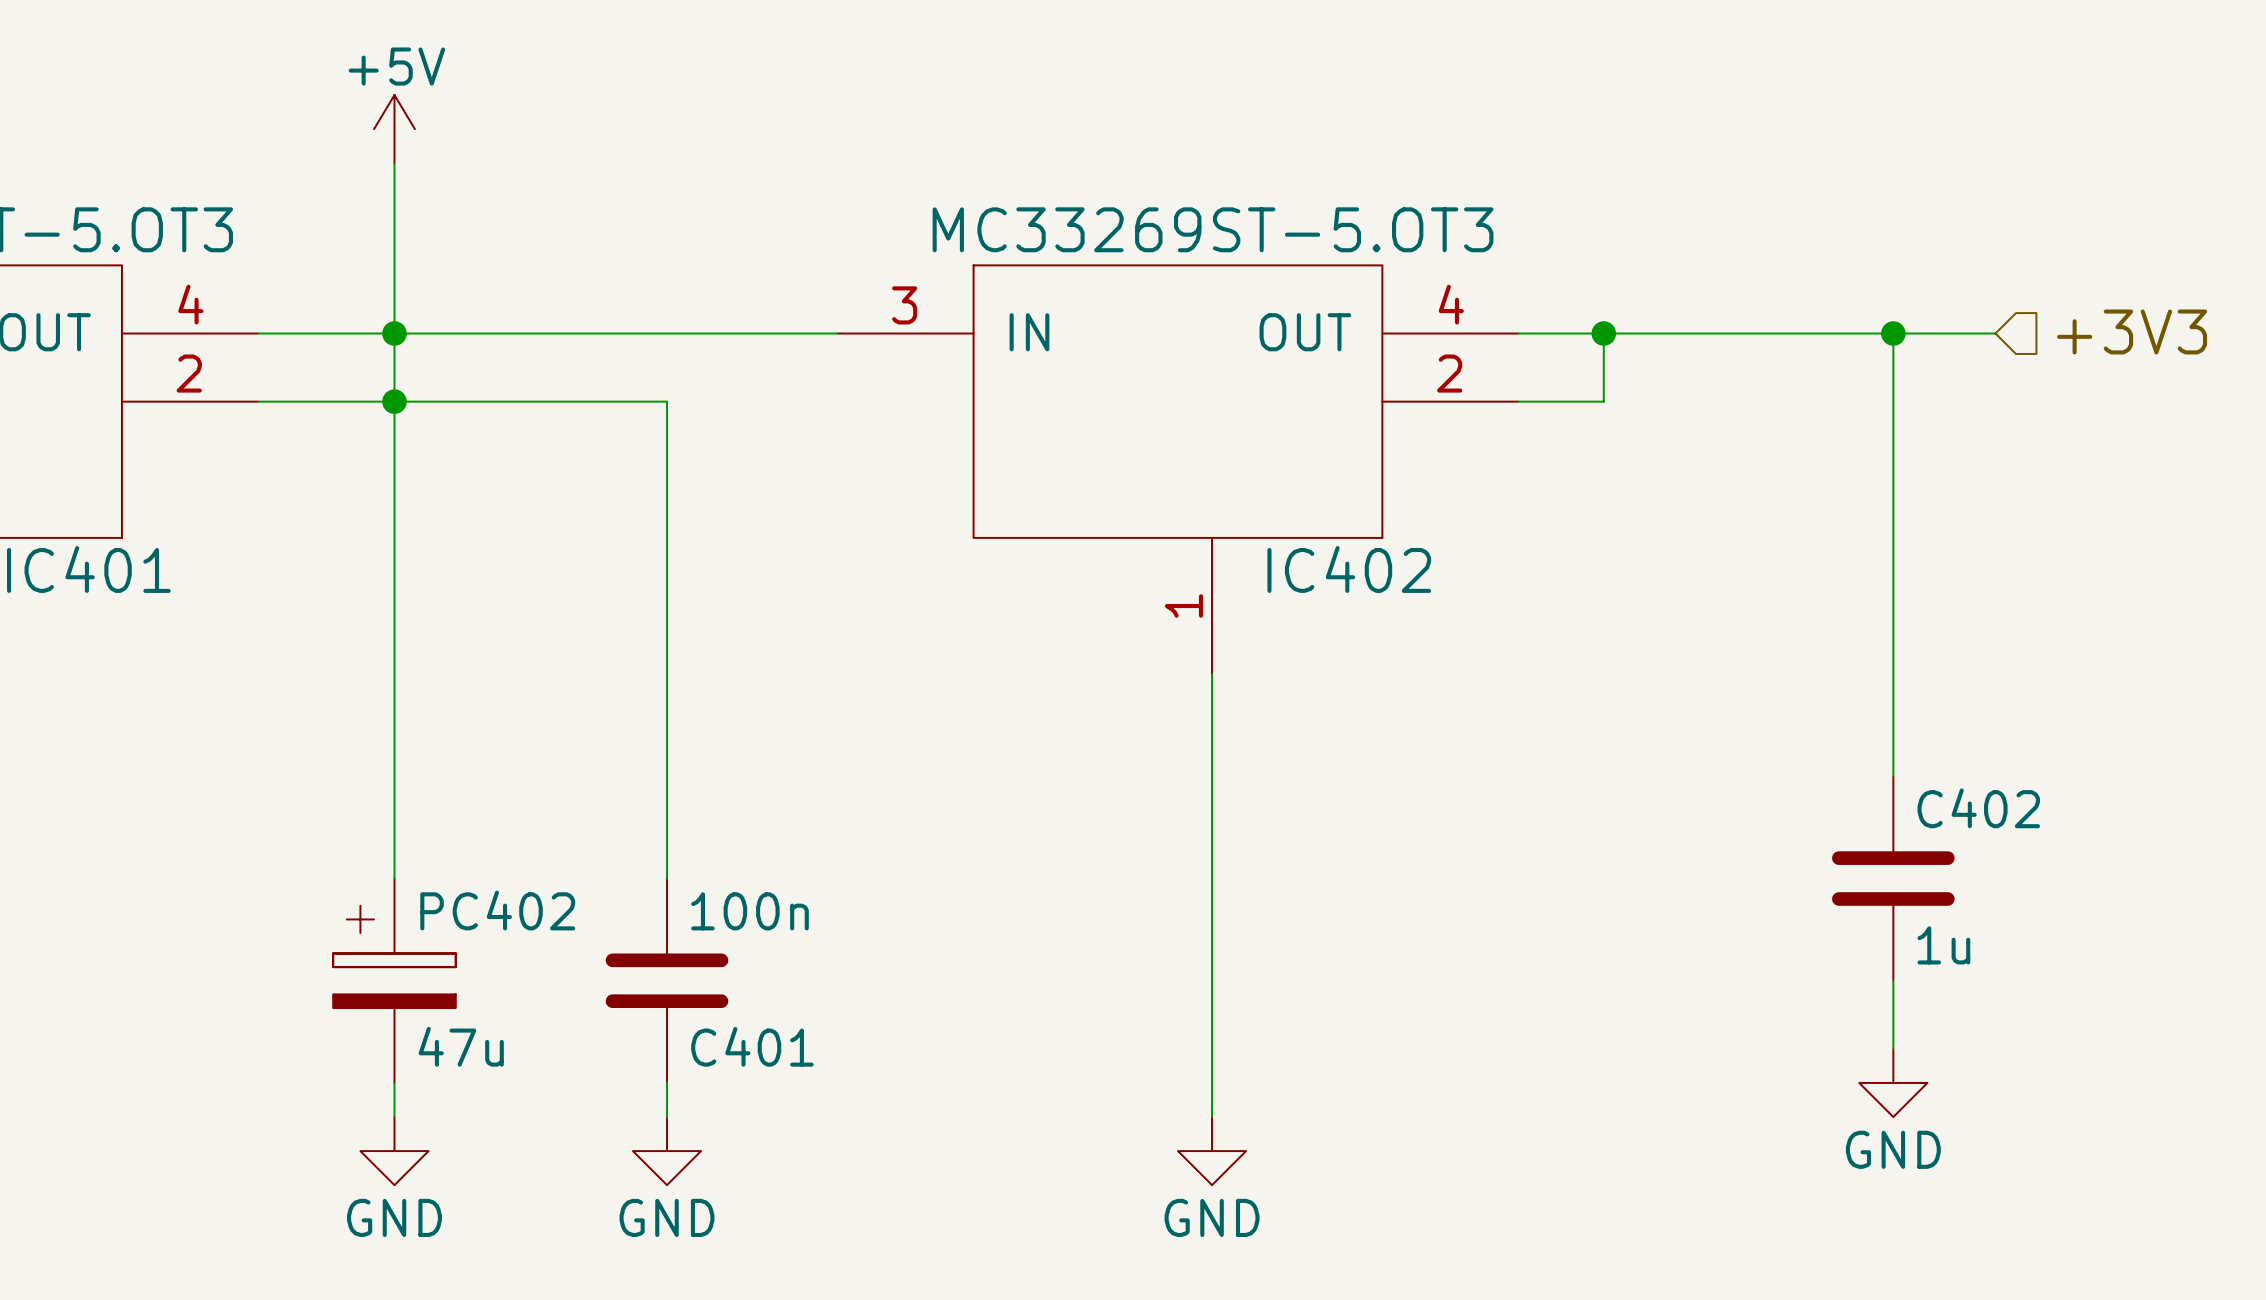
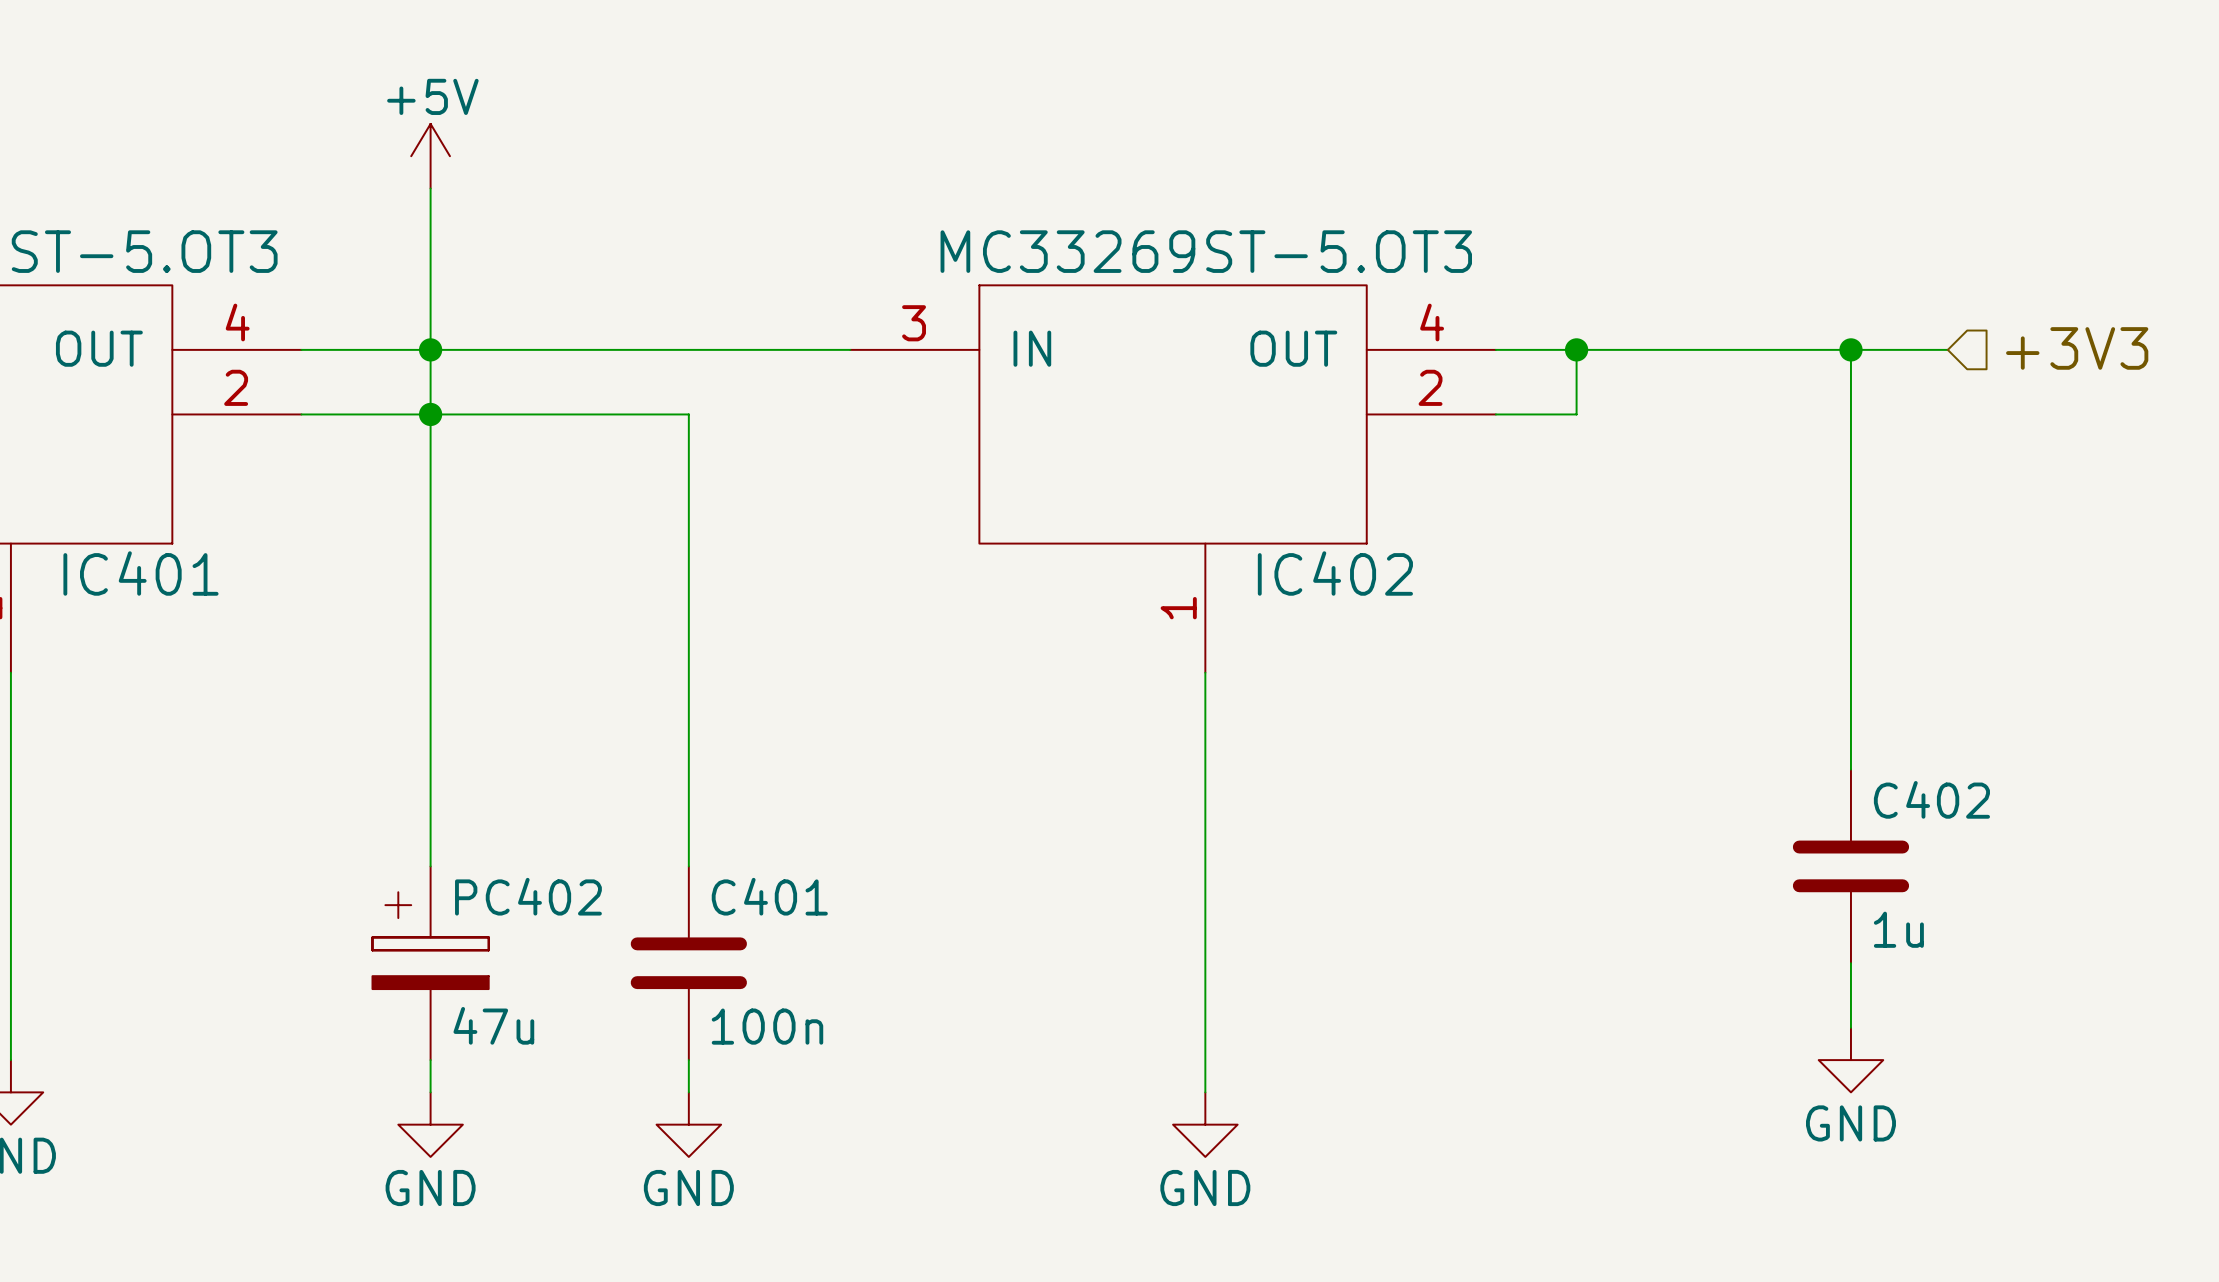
C401 value position: 100n (749, 911) -> 100n (767, 1026)
C401 name position: C401 (752, 1046) -> C401 (769, 896)

